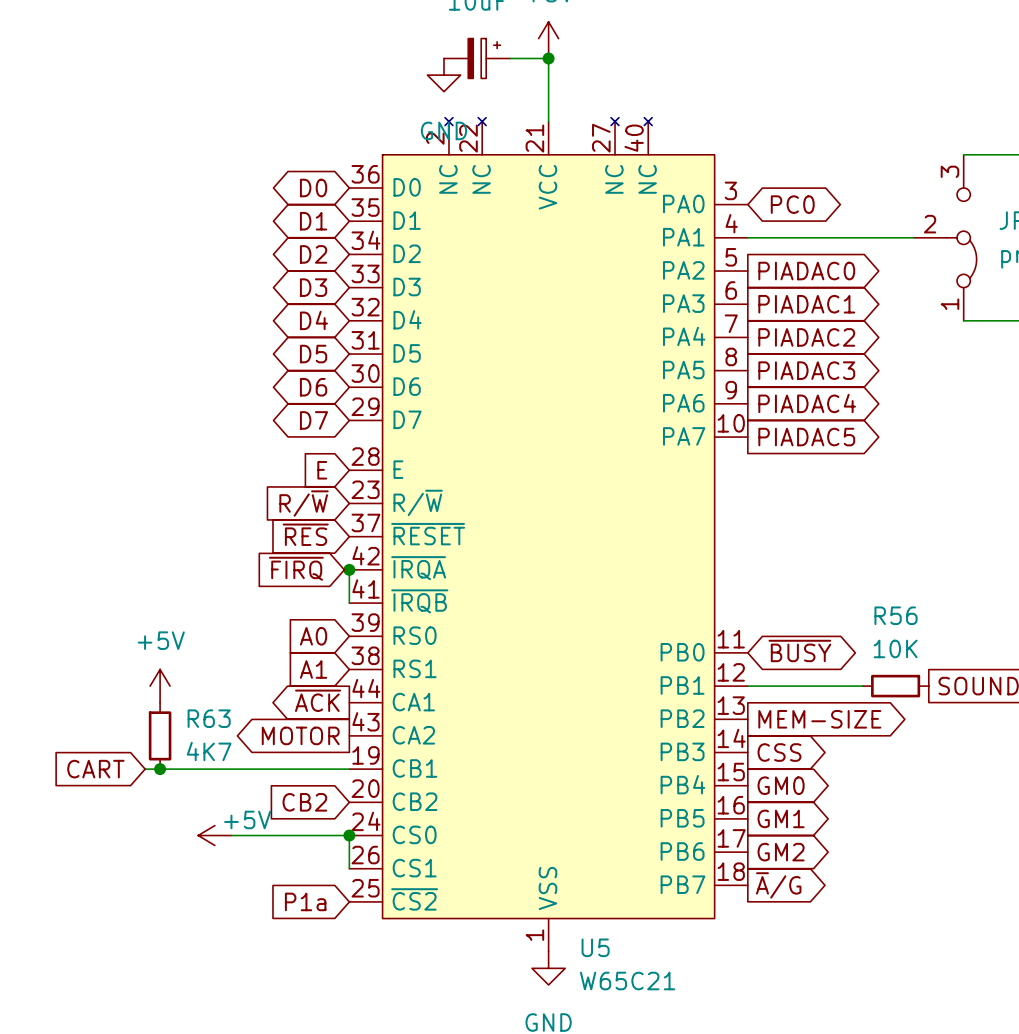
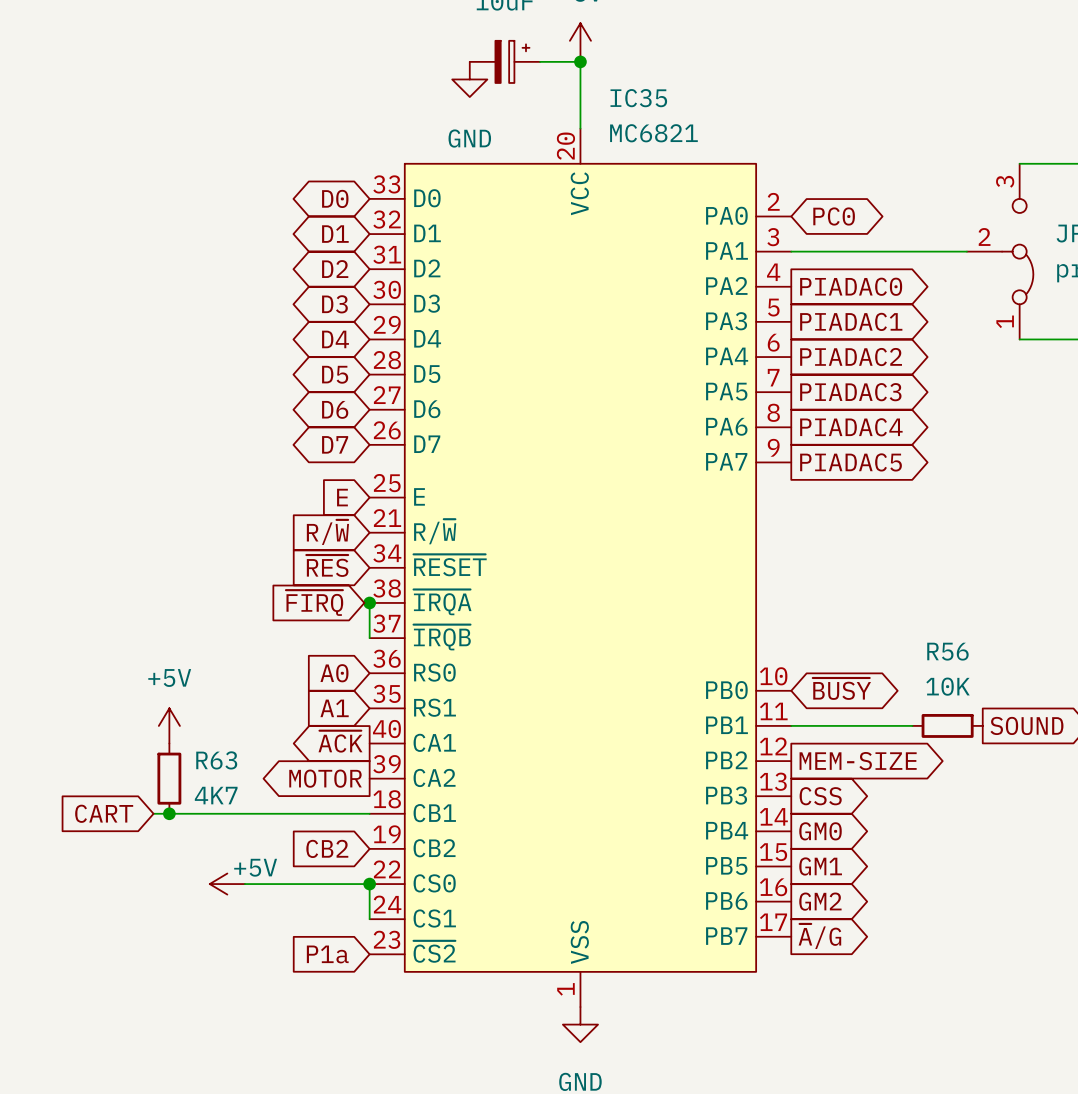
U5: W65C21 (548, 534) -> none
IC35: none -> MC6821 (580, 567)

